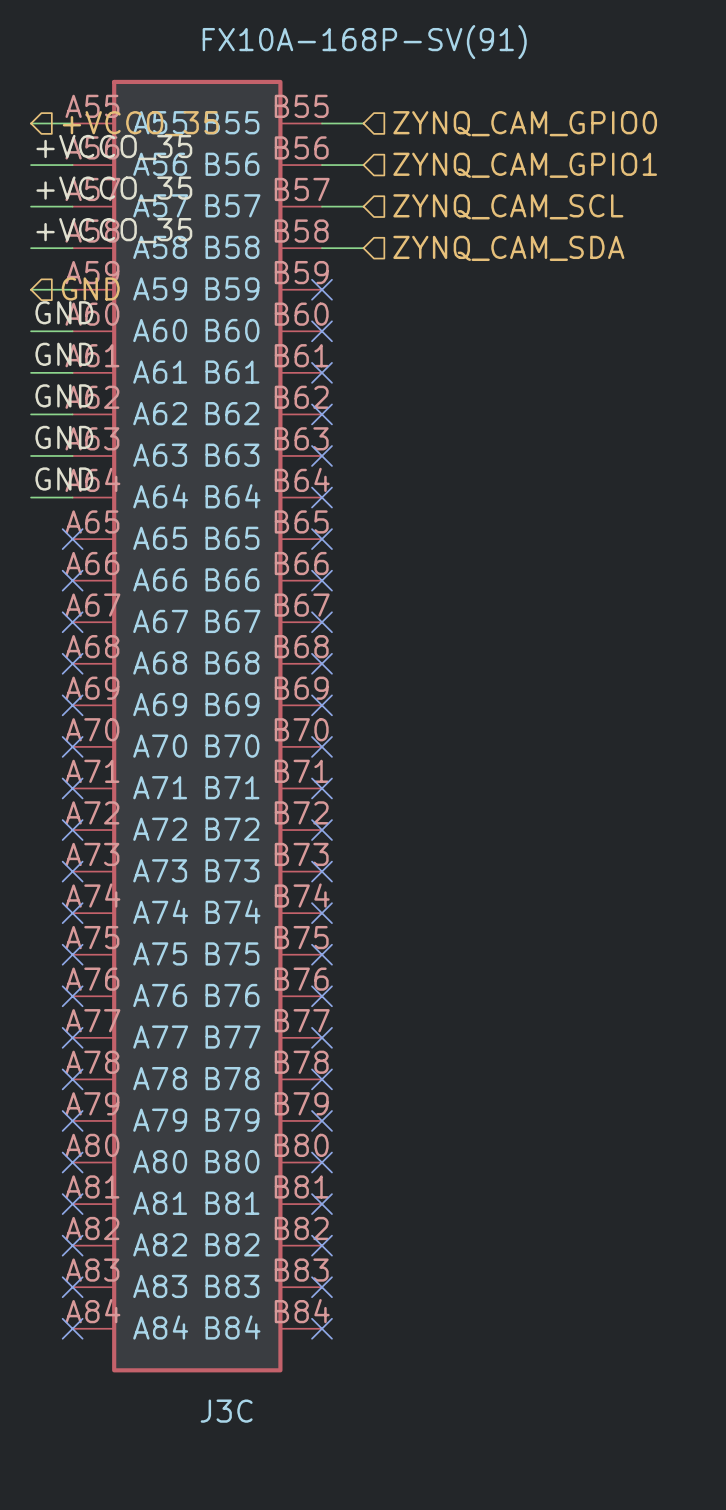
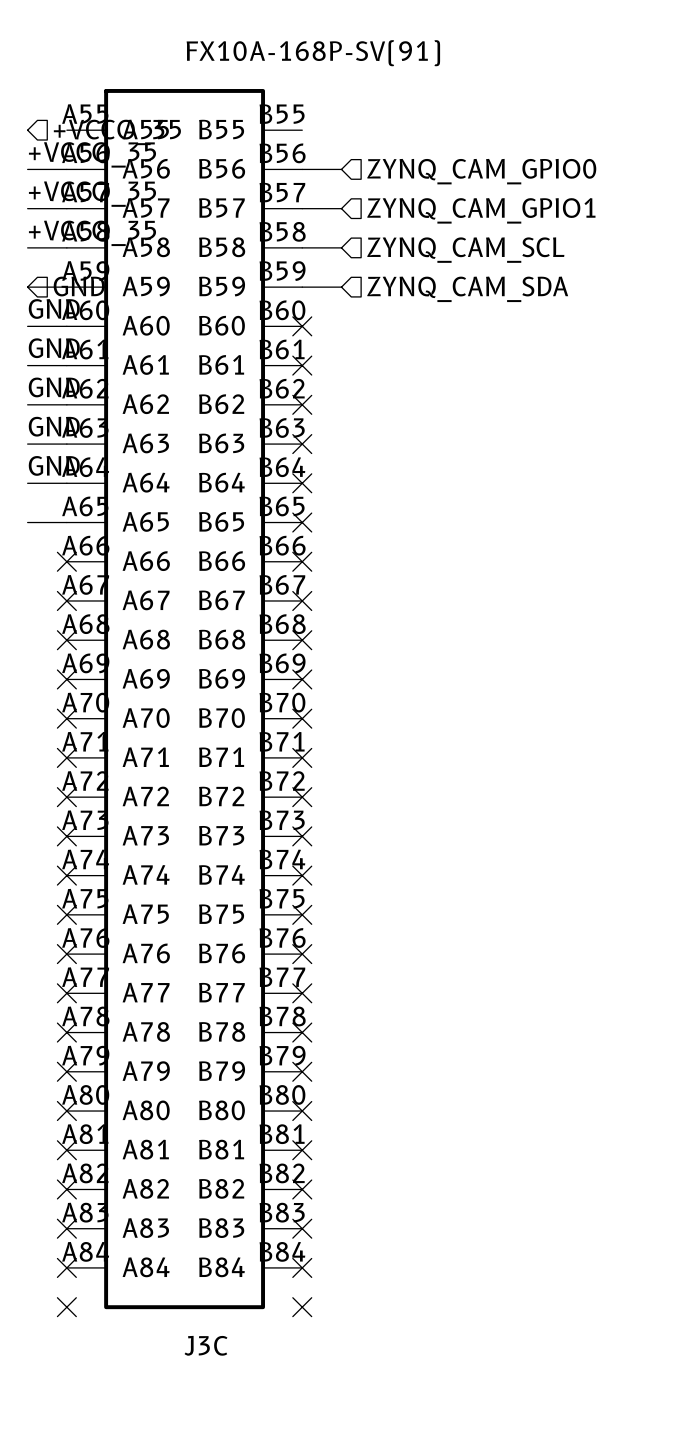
wire: (31, 123) (72, 123) -> none
wire: (321, 123) (363, 123) -> (302, 287) (341, 287)
hierarchical label: ZYNQ_CAM_GPIO0 (525, 123) -> none
hierarchical label: ZYNQ_CAM_GPIO1 (525, 165) -> ZYNQ_CAM_GPIO0 (481, 171)
hierarchical label: ZYNQ_CAM_SCL (508, 206) -> ZYNQ_CAM_GPIO1 (481, 210)
hierarchical label: ZYNQ_CAM_SDA (508, 248) -> ZYNQ_CAM_SCL (465, 250)
no-connect mark: (321, 289) -> none
hierarchical label: none -> ZYNQ_CAM_SDA (467, 289)
wire: none -> (27, 522) (66, 522)
no-connect mark: (72, 539) -> none
no-connect mark: none -> (66, 1307)
no-connect mark: none -> (302, 1307)

